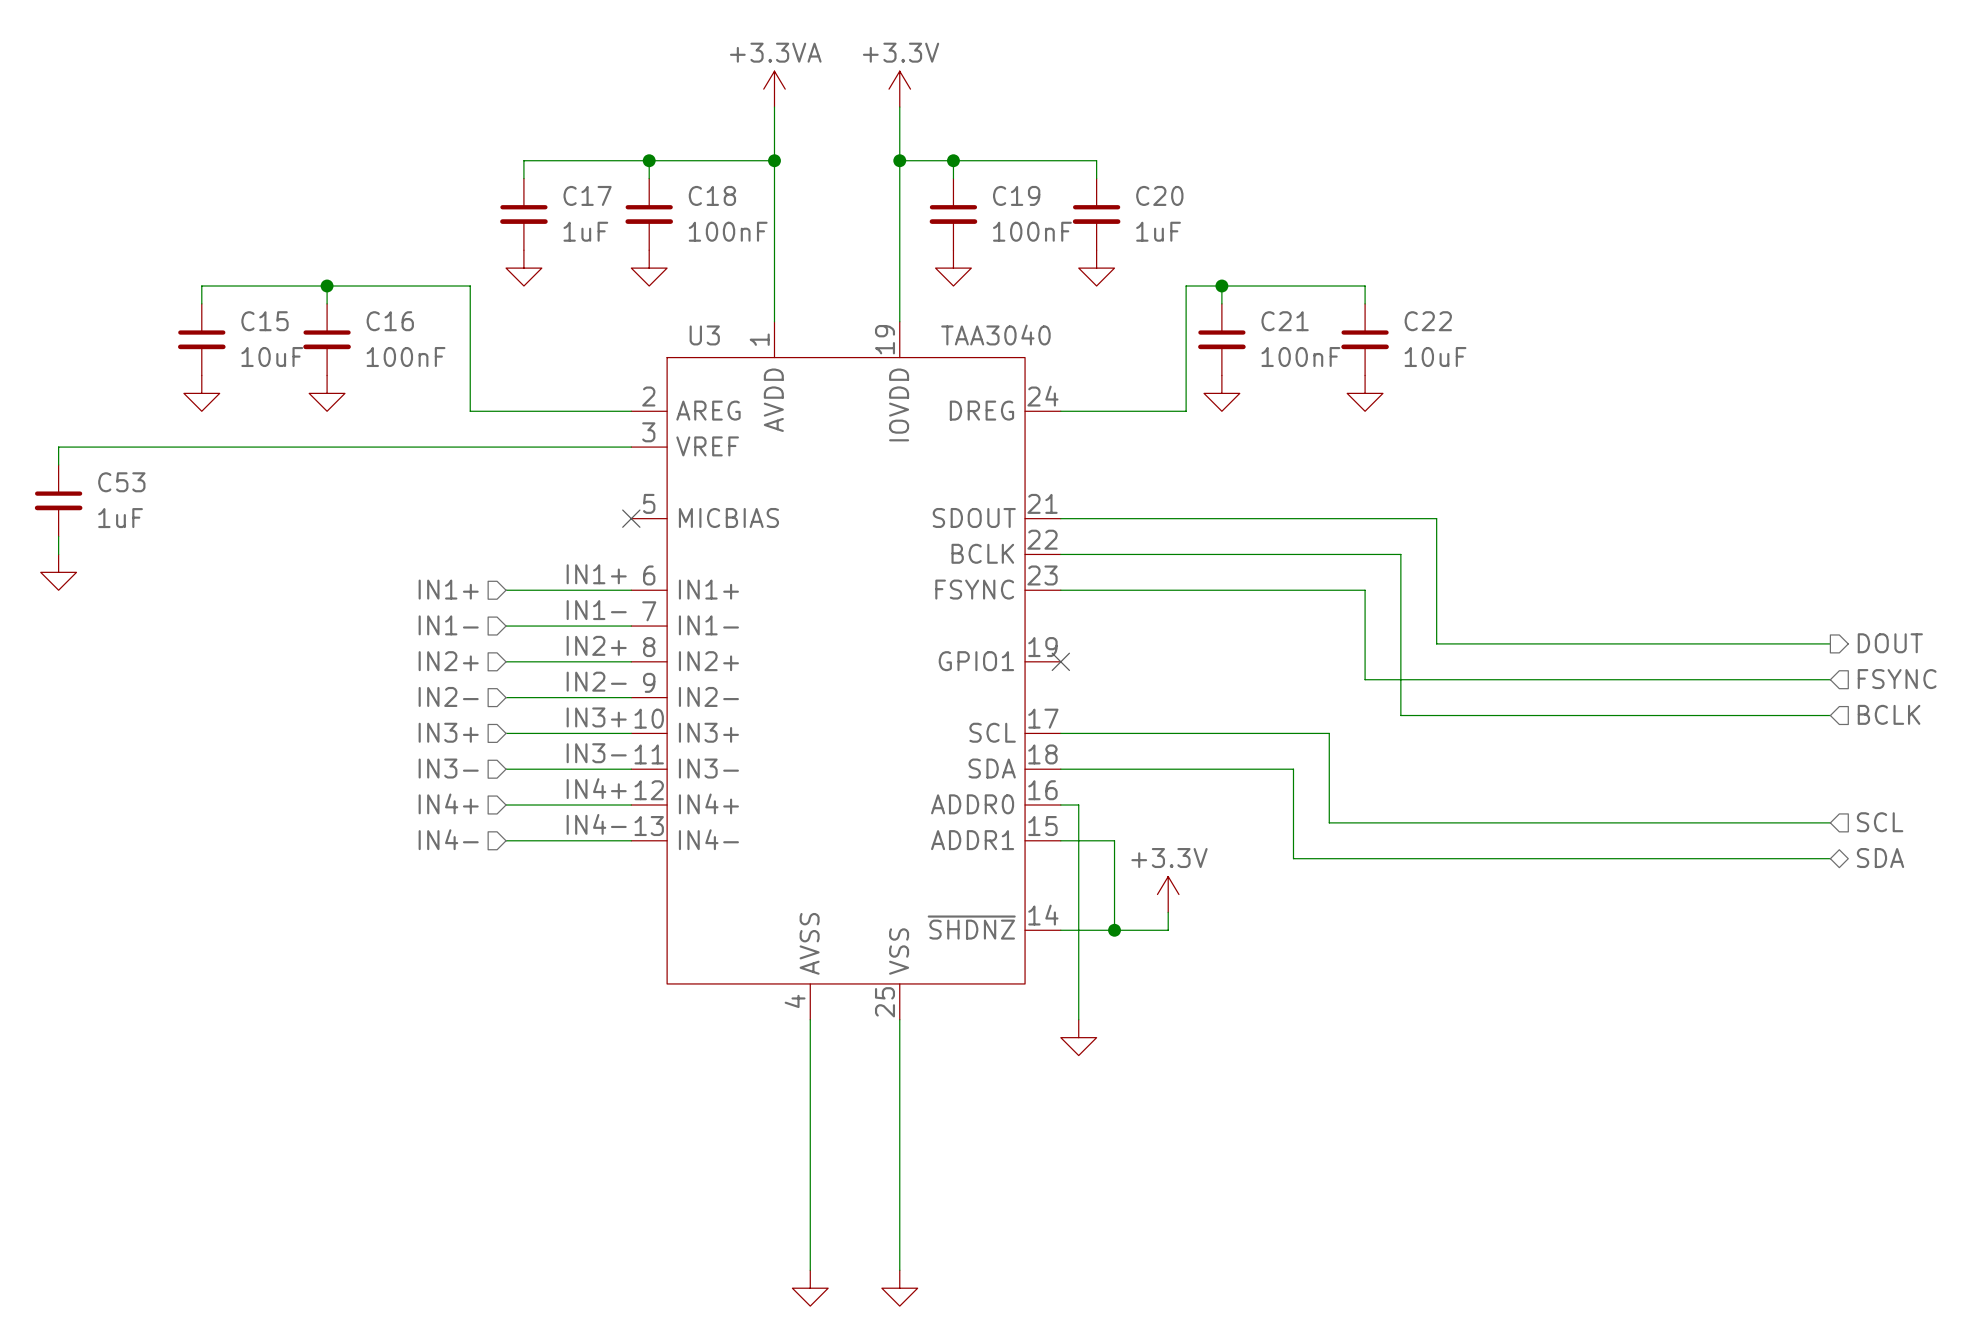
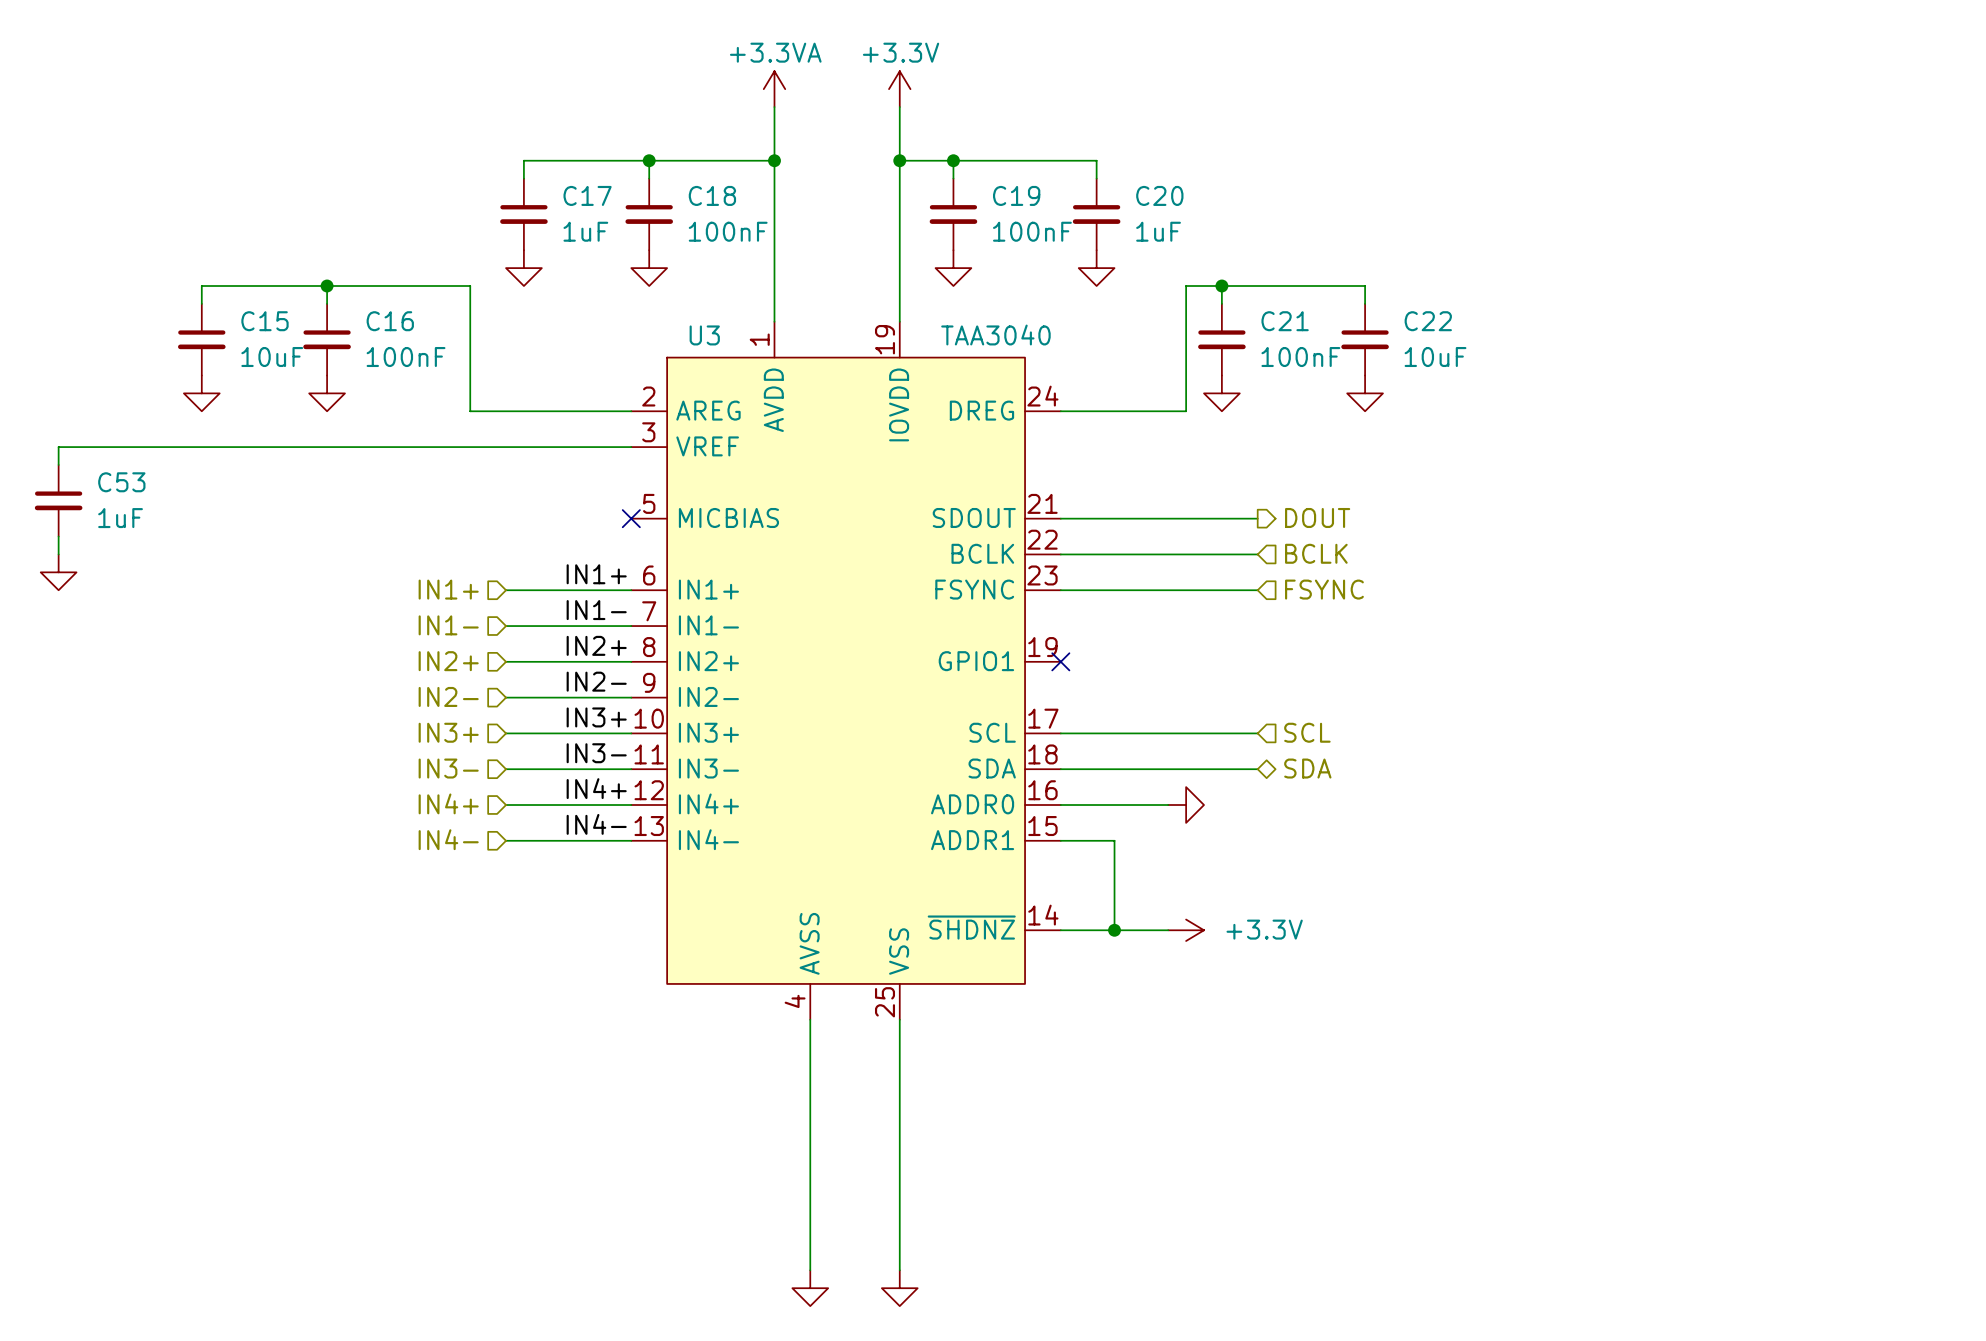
hierarchical label: none -> DOUT (1317, 517)
wire: (1257, 518) (1436, 518) (1436, 643) (1830, 643) -> none
hierarchical label: none -> BCLK (1316, 553)
wire: (1257, 554) (1400, 554) (1400, 715) (1830, 715) -> none
hierarchical label: none -> FSYNC (1324, 589)
wire: (1257, 590) (1365, 590) (1365, 679) (1830, 679) -> none
hierarchical label: DOUT (1890, 643) -> none
hierarchical label: FSYNC (1897, 679) -> none
hierarchical label: BCLK (1889, 714) -> none
hierarchical label: none -> SCL (1307, 732)
wire: (1257, 733) (1329, 733) (1329, 822) (1830, 822) -> none
hierarchical label: none -> SDA (1307, 768)
wire: (1257, 769) (1293, 769) (1293, 858) (1830, 858) -> none
wire: (1078, 805) (1078, 1019) -> (1078, 805) (1168, 805)
hierarchical label: SCL (1880, 822) -> none
power symbol text position: +3.3V (1169, 858) -> +3.3V (1264, 929)
hierarchical label: SDA (1880, 858) -> none
power symbol rotation: 0° (1168, 894) -> 90° clockwise (1186, 930)
power symbol position: +3.3V (1168, 894) -> +3.3V (1186, 930)
wire: (1168, 912) (1168, 930) -> none
power symbol rotation: 0° (1078, 1037) -> 90° counterclockwise (1186, 805)
power symbol position: (1078, 1037) -> (1186, 805)

